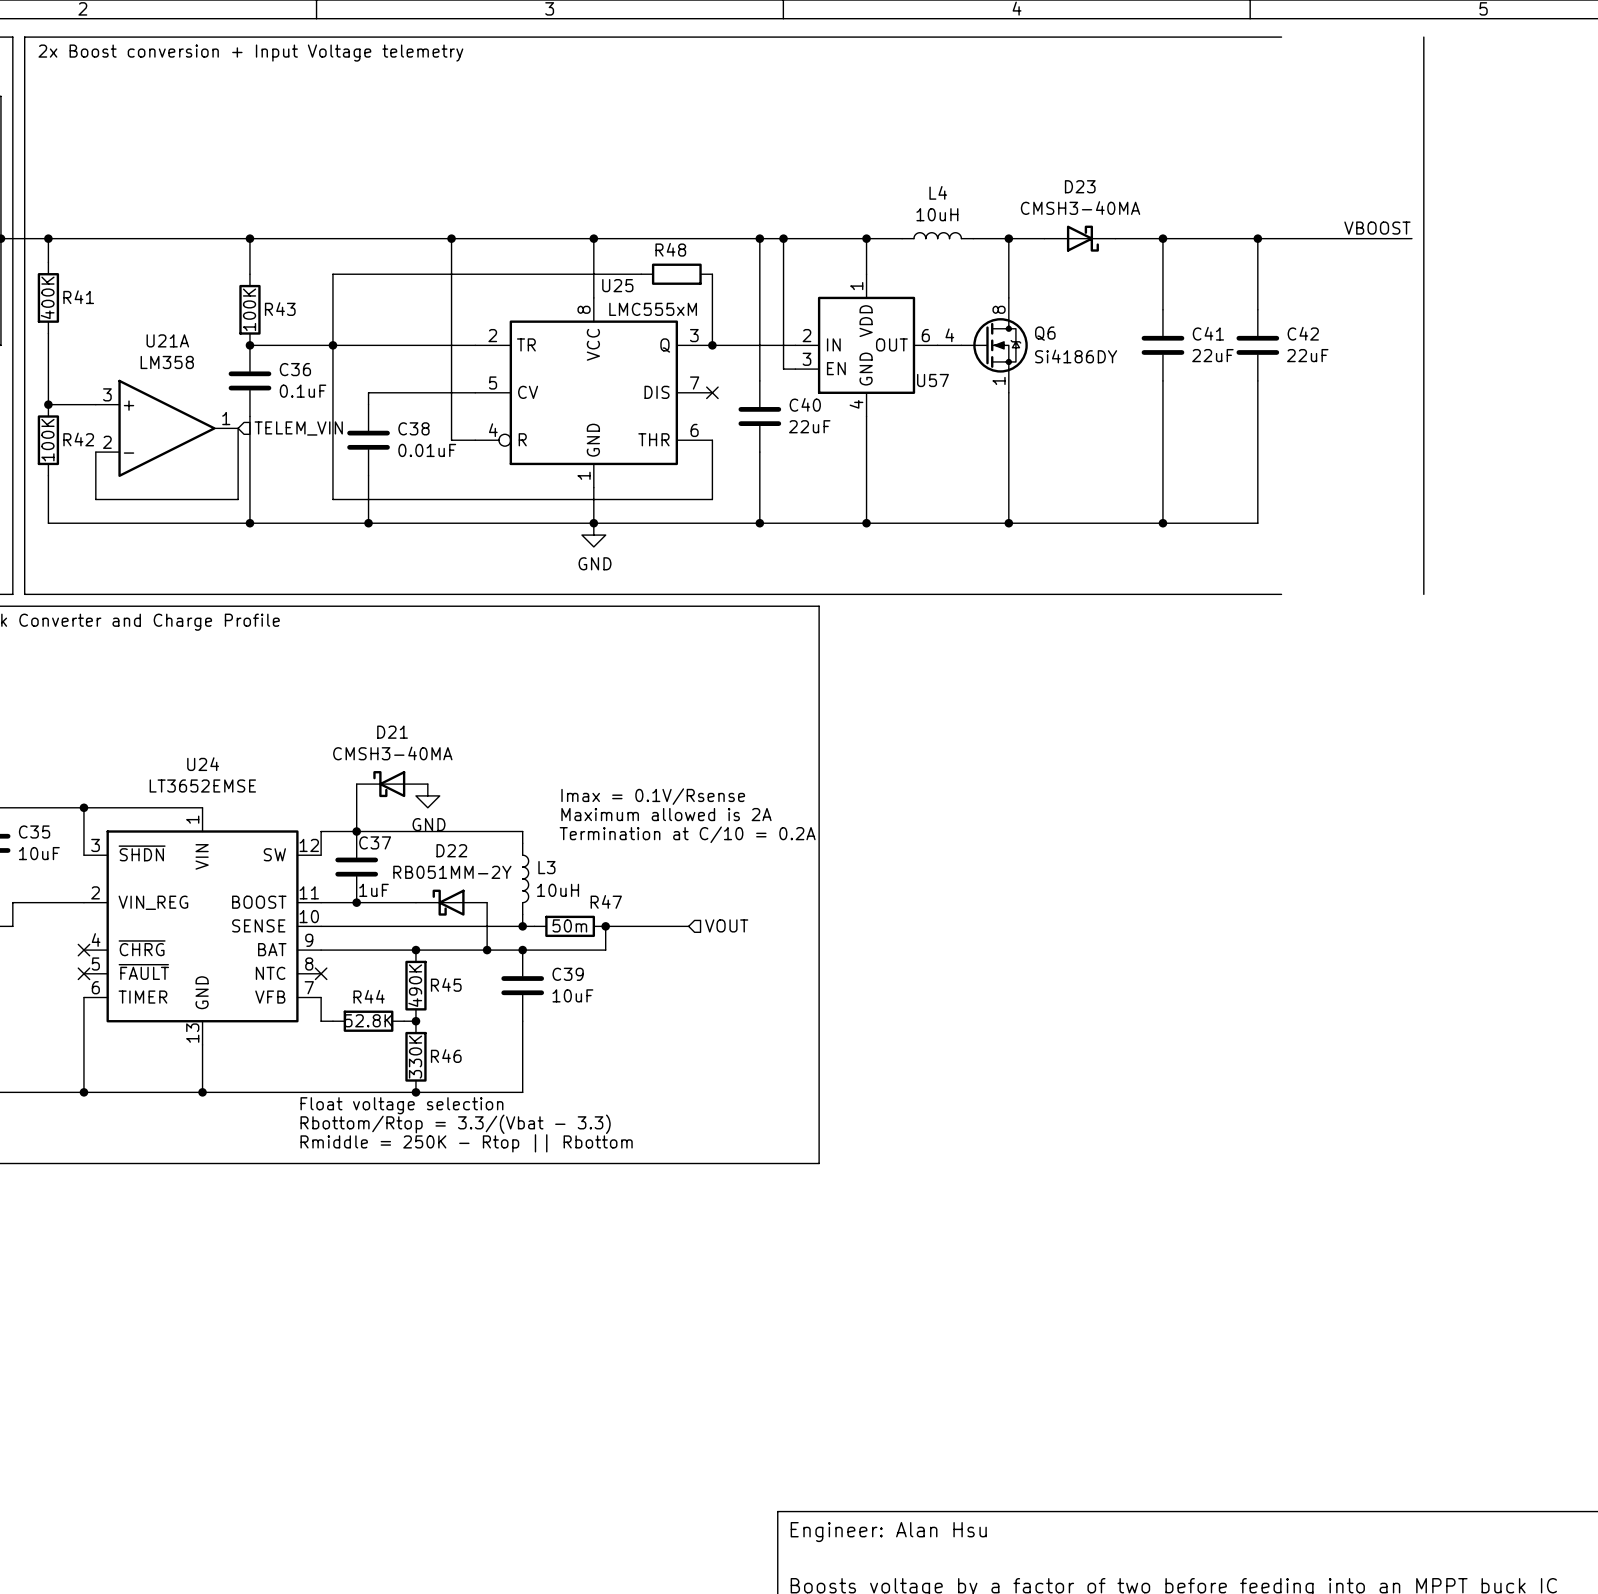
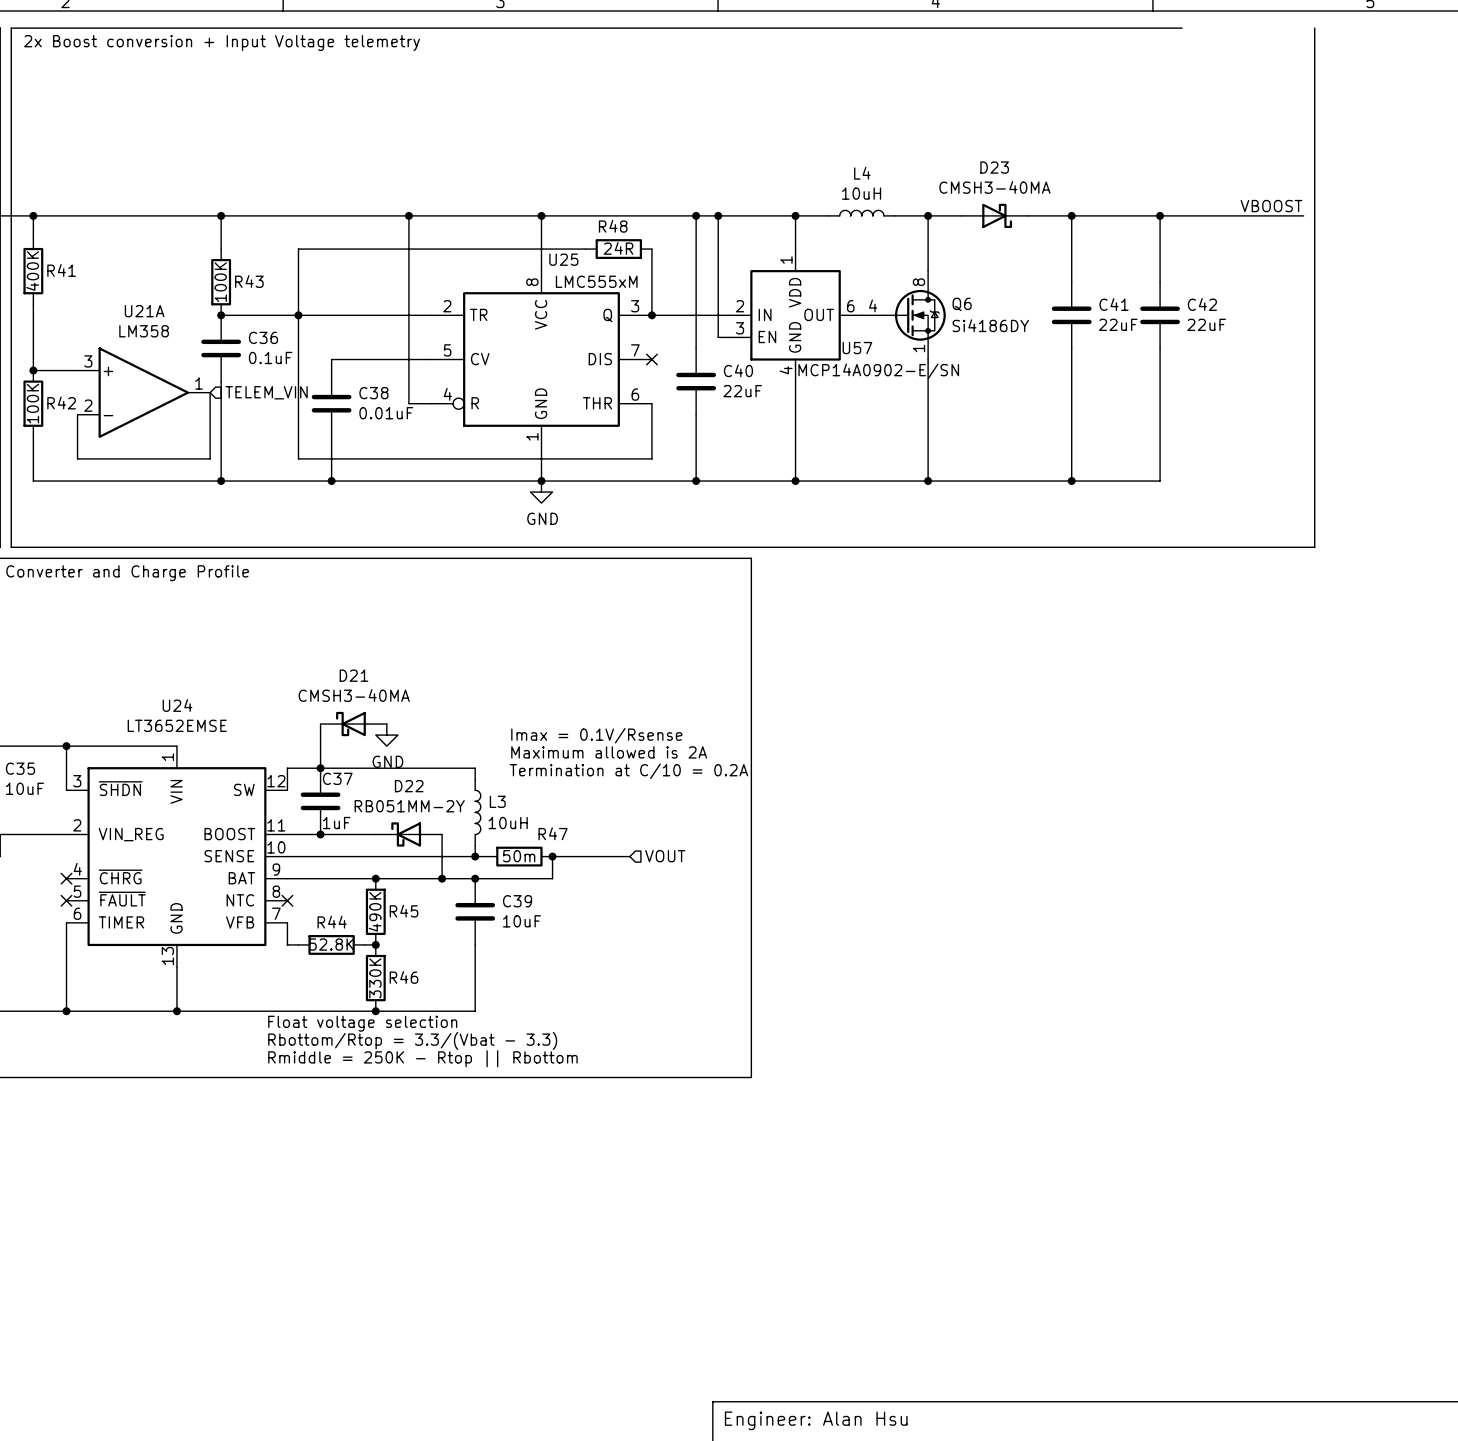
R48 value: none -> 24R (618, 248)
U57 value: none -> MCP14A0902-E/SN (878, 371)
line: none -> (1182, 547) (1314, 547)

